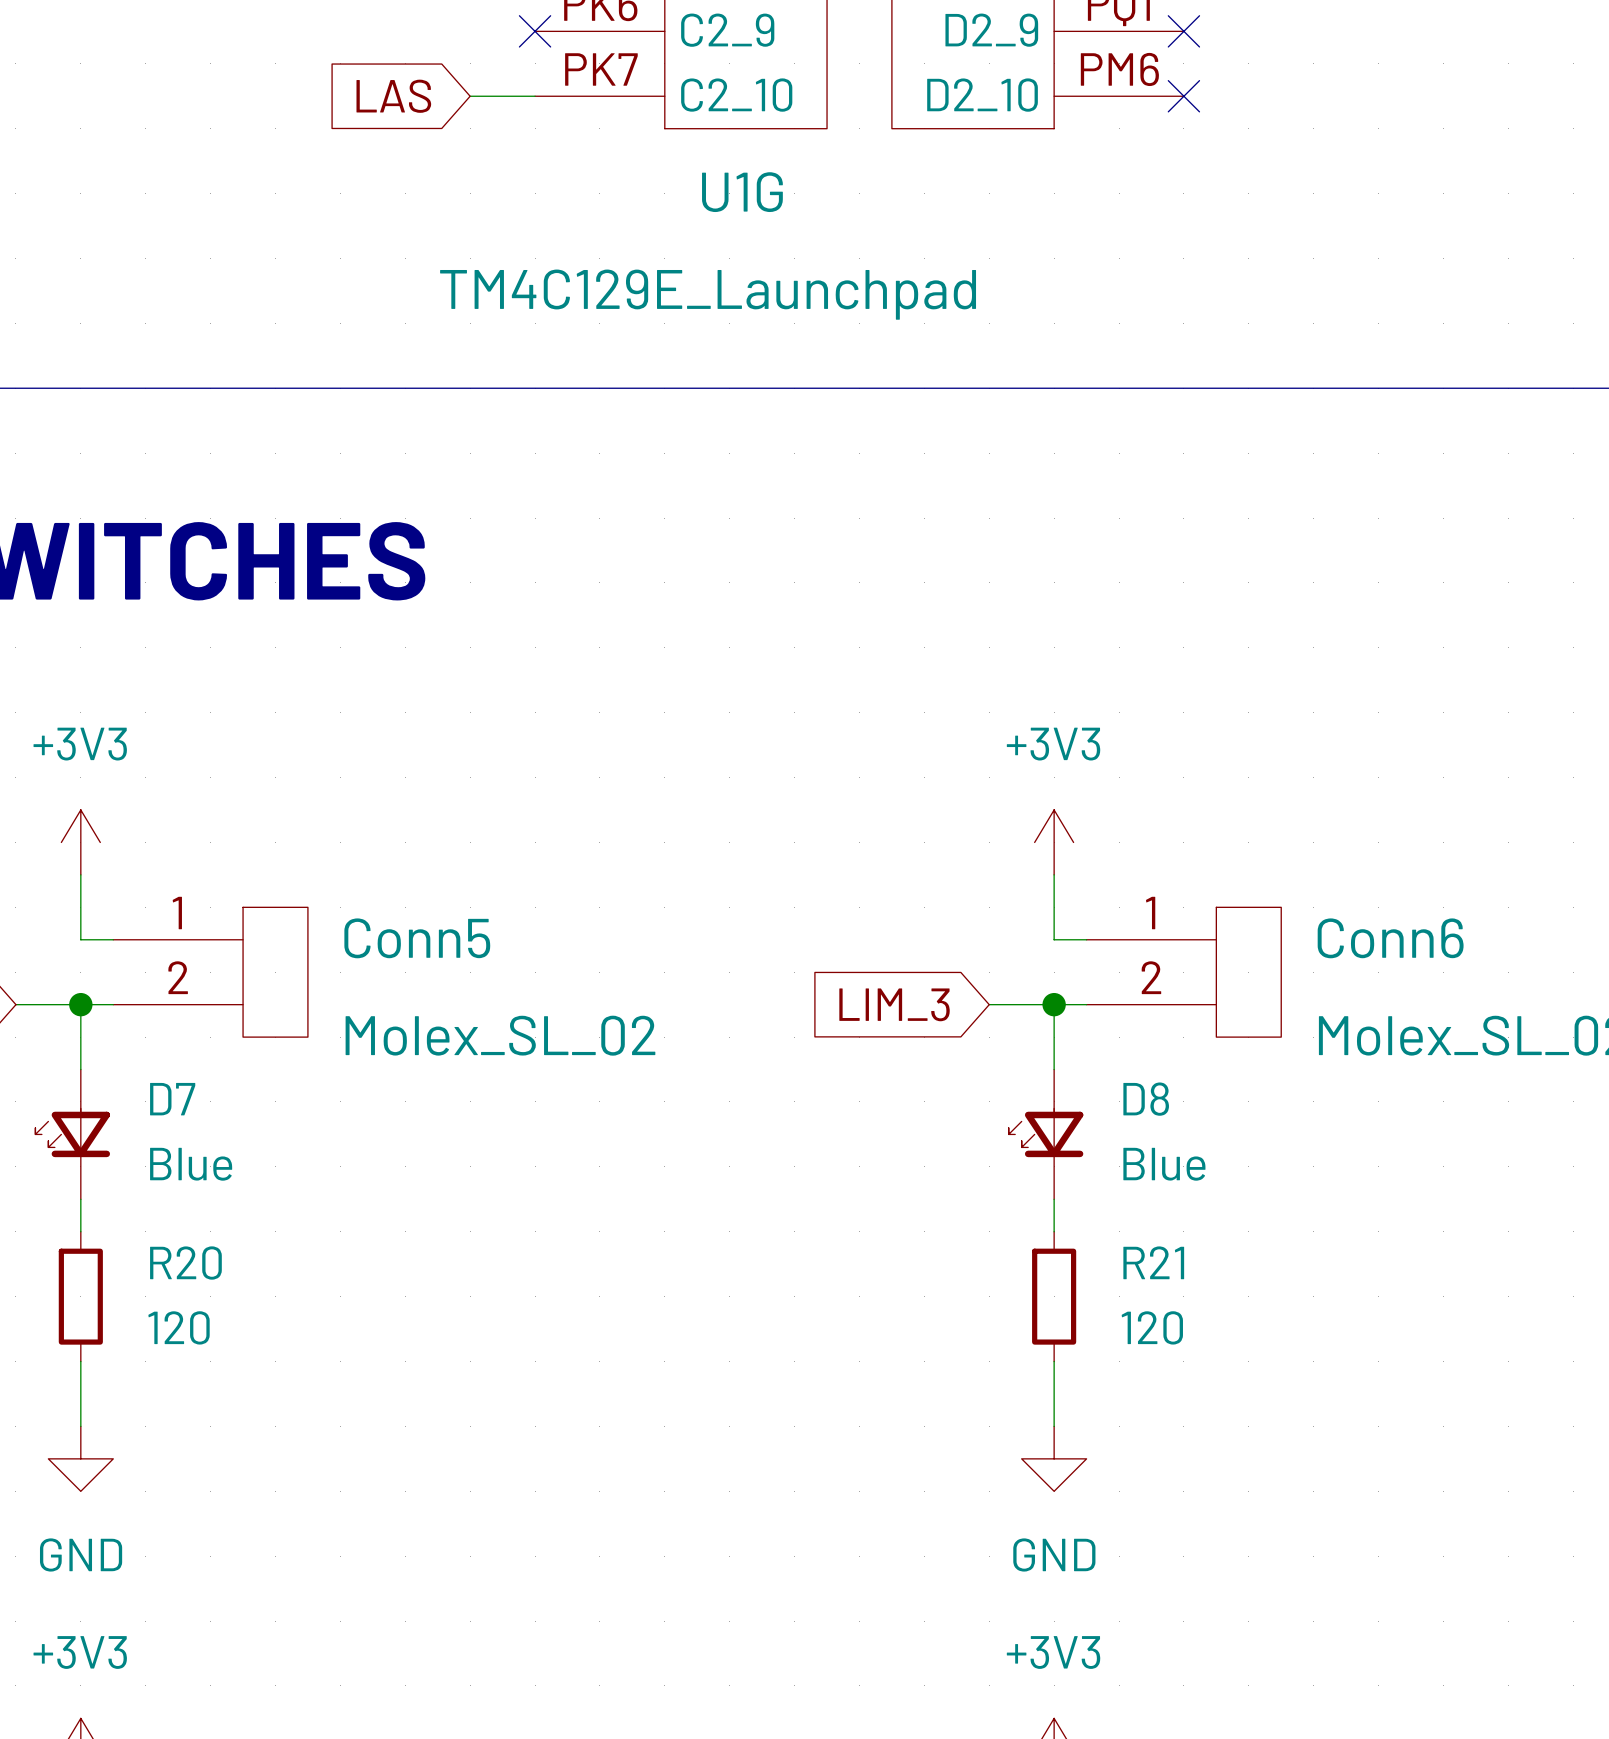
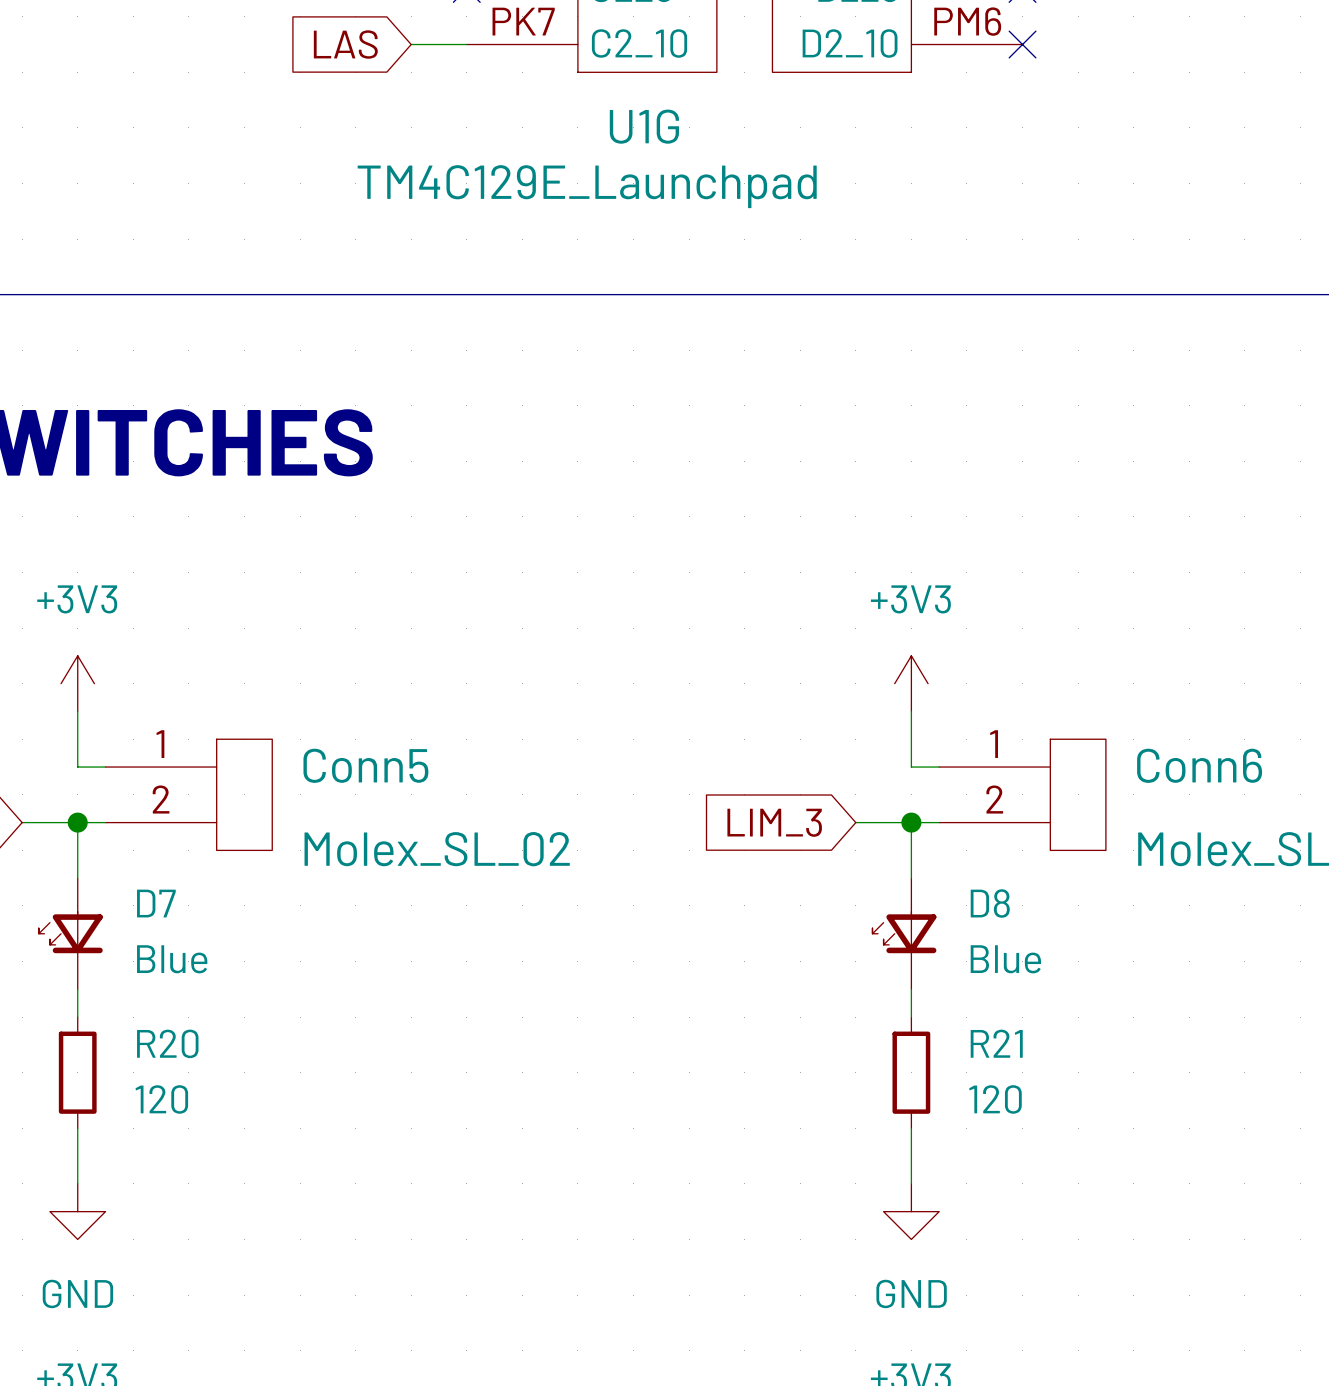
U1G value position: TM4C129E_Launchpad (708, 294) -> TM4C129E_Launchpad (587, 186)

